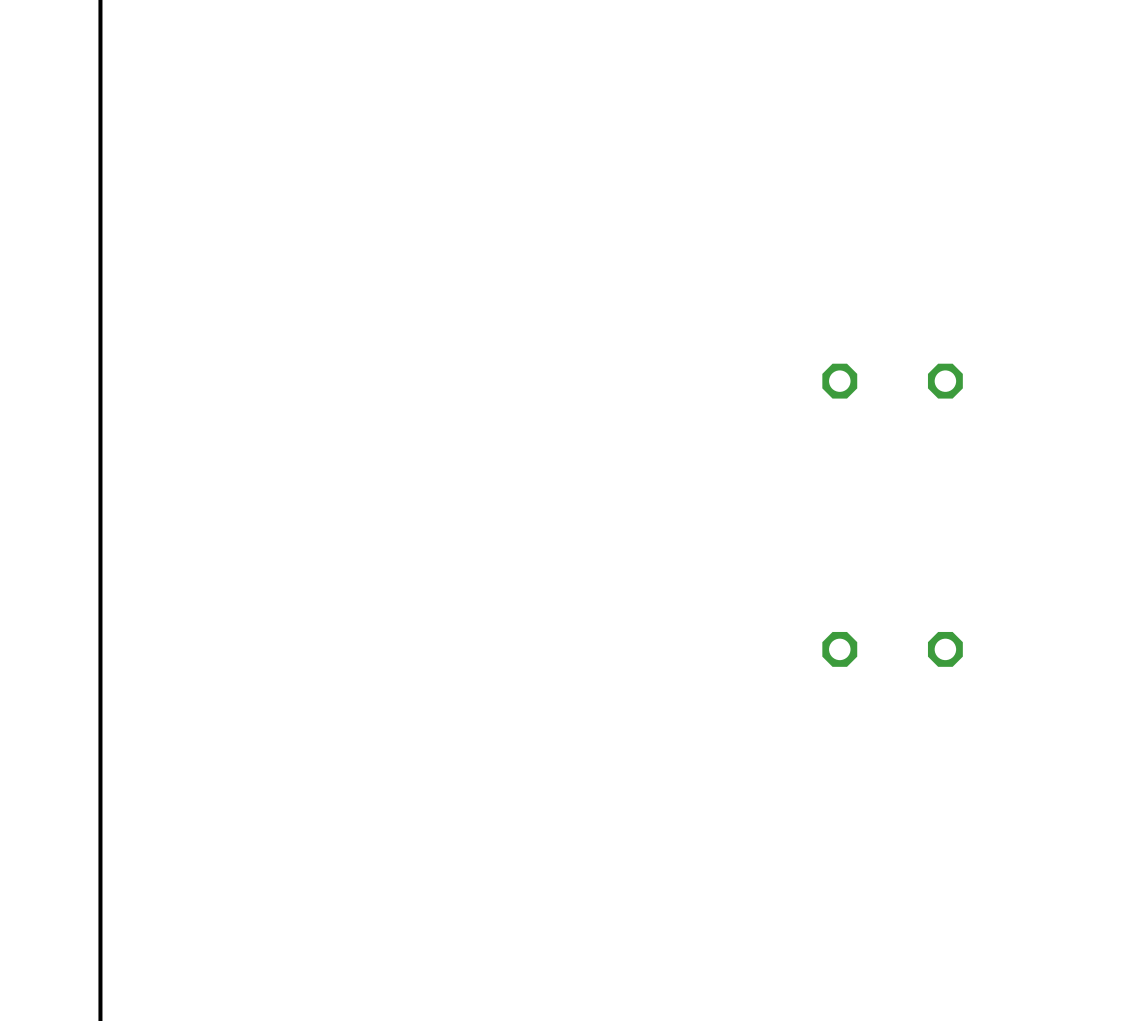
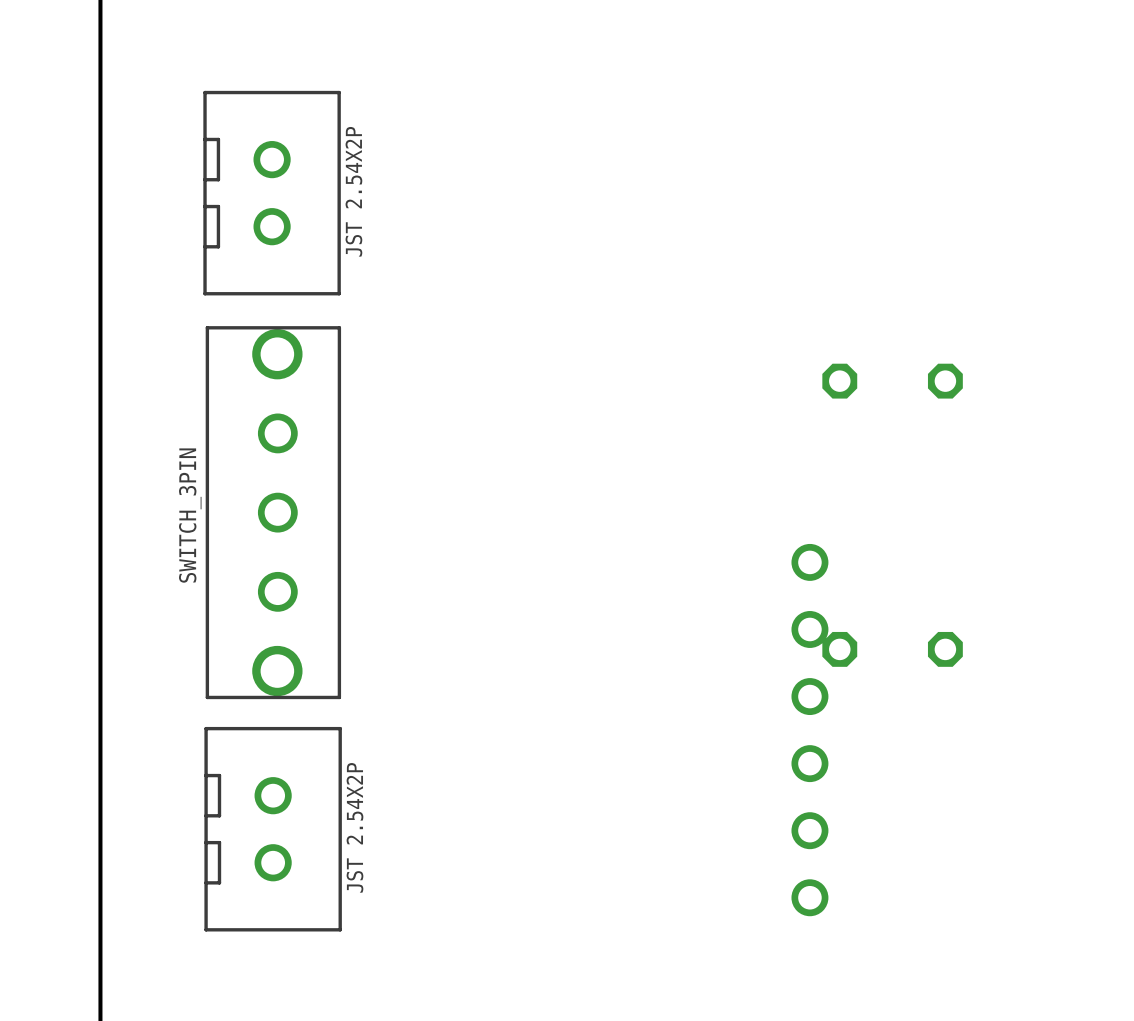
part: none -> (272, 193)
part: none -> (273, 512)
part: none -> (809, 730)
part: none -> (273, 829)

